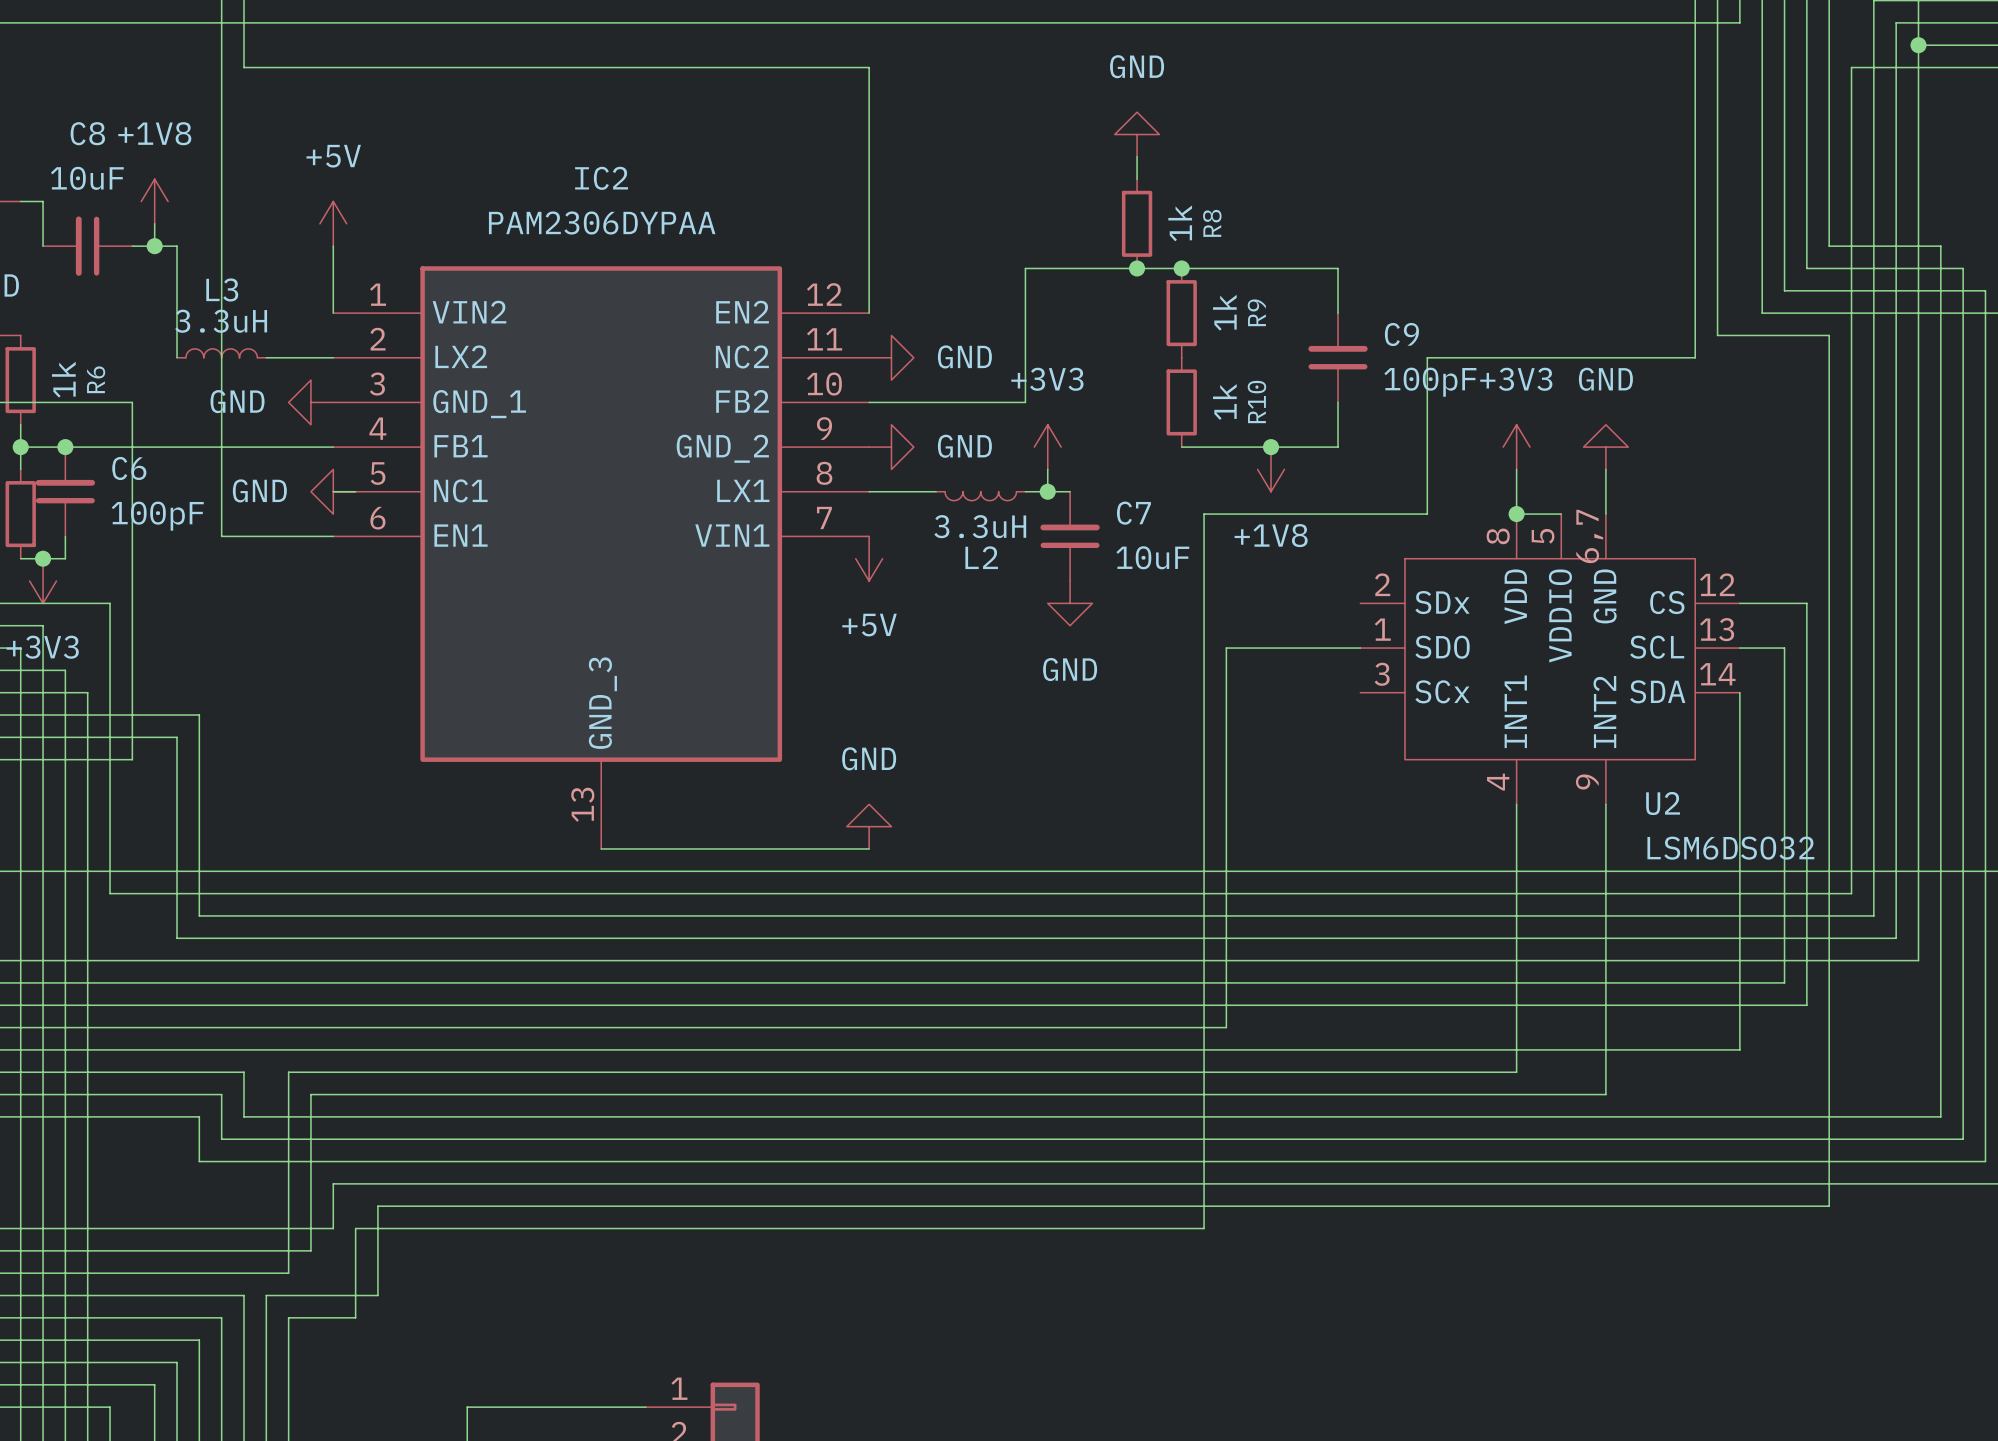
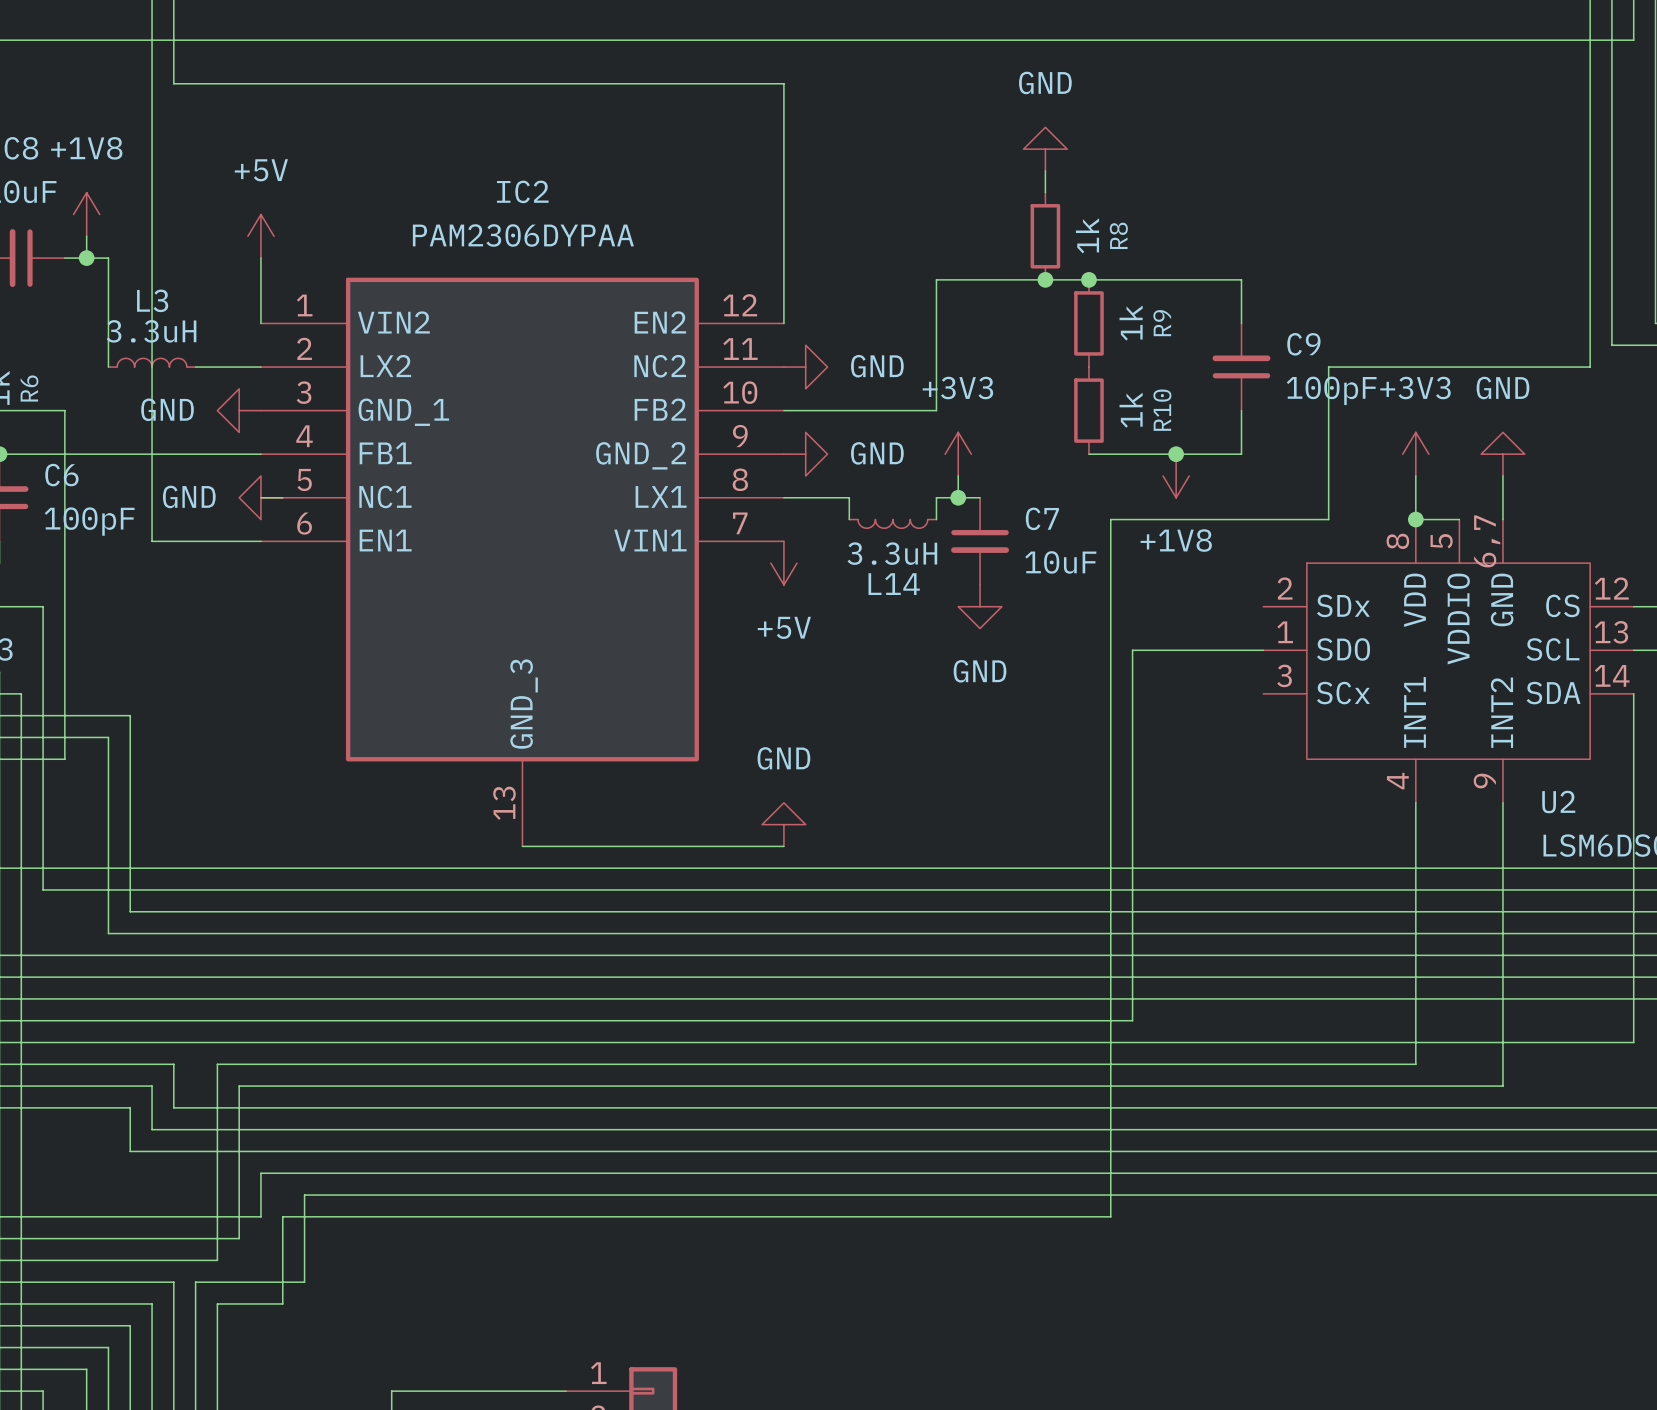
wire: none -> (849, 497) (849, 519)
wire: none -> (936, 497) (936, 519)
L2: 3.3uH (980, 496) -> none
L14: none -> 3.3uH (892, 523)
C7 rotation: 0° (1070, 536) -> 180° (980, 541)

